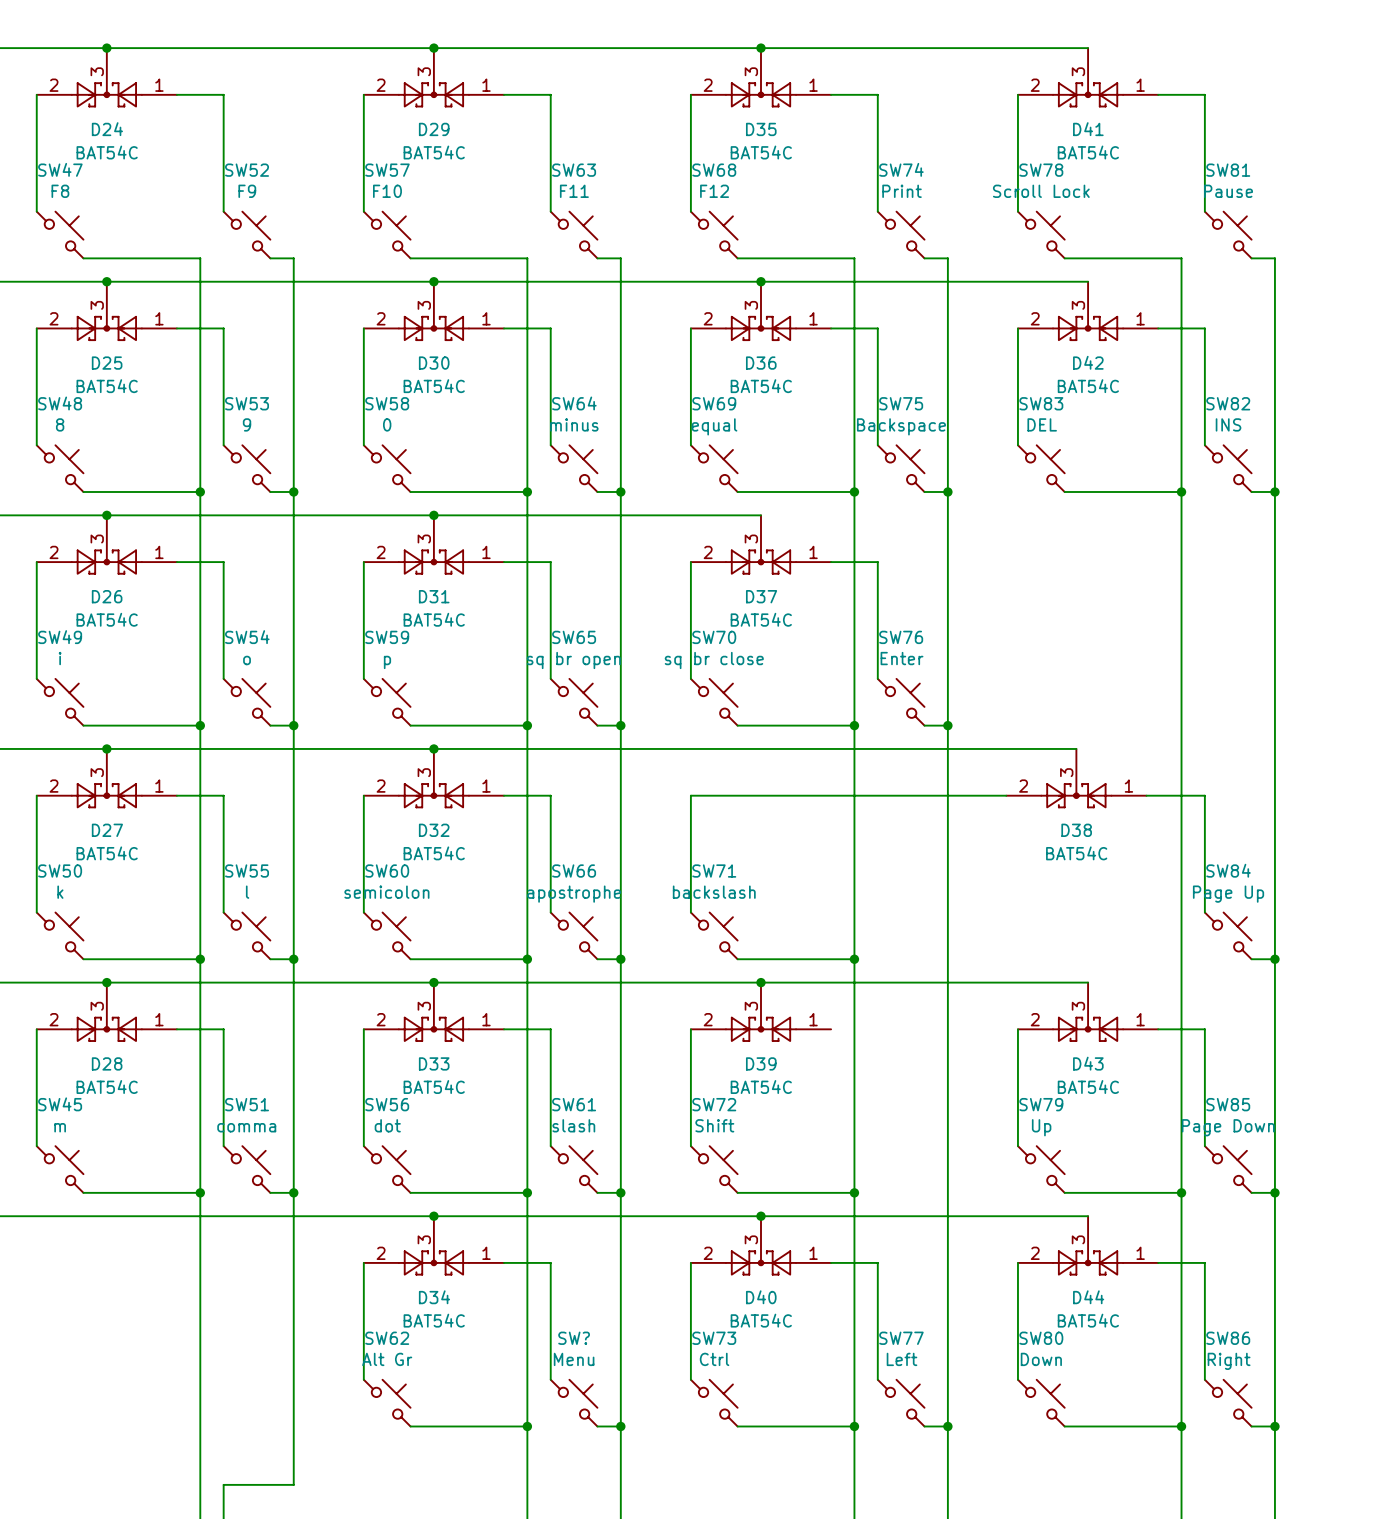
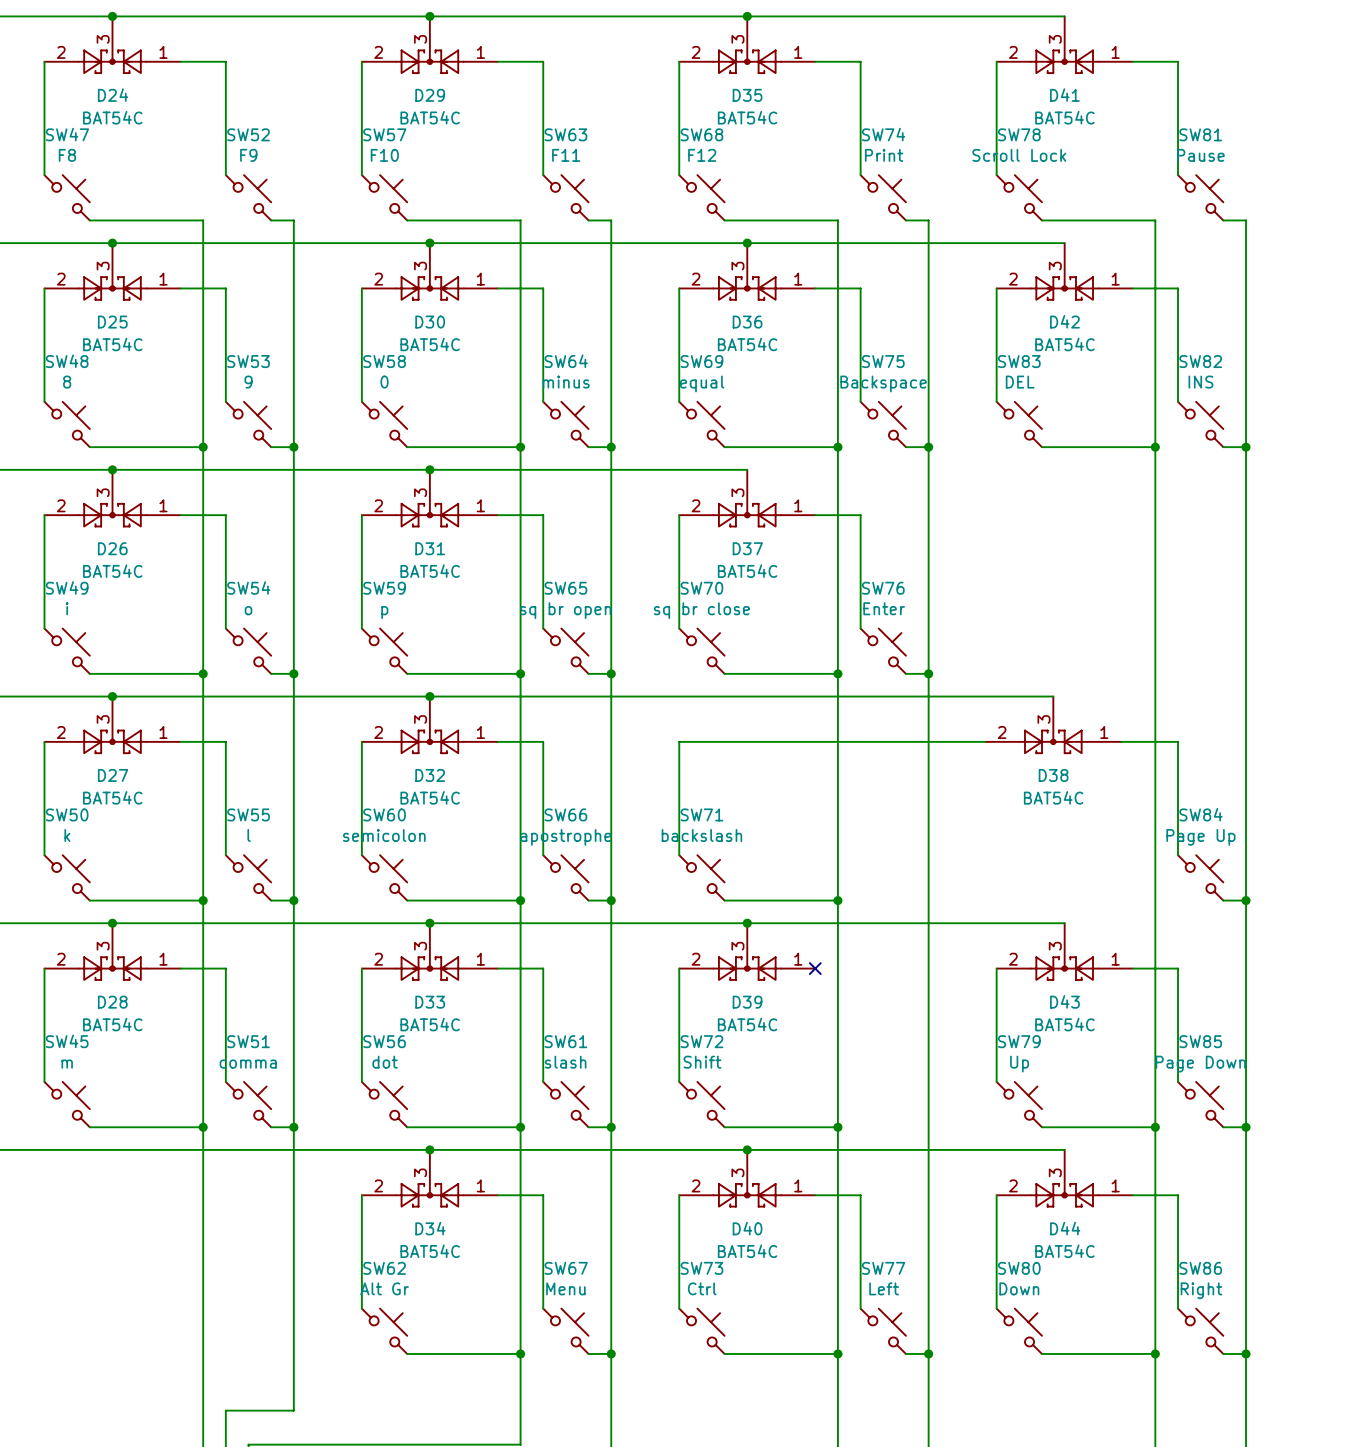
no-connect mark: none -> (815, 968)
SW? name: SW? (574, 1338) -> SW67 (566, 1268)

